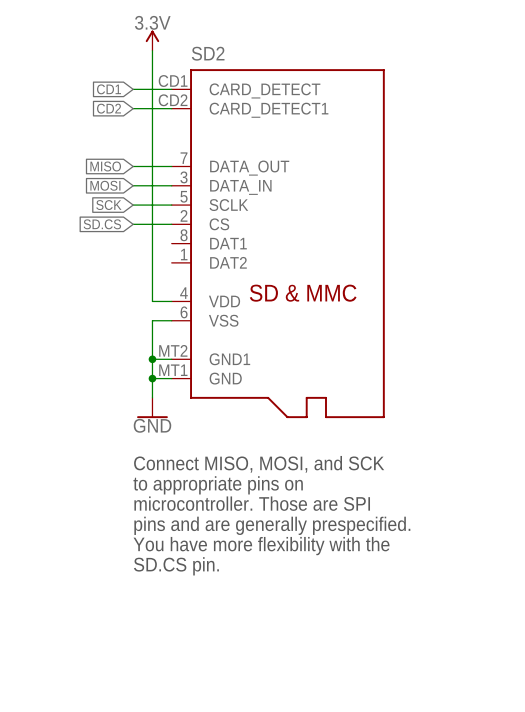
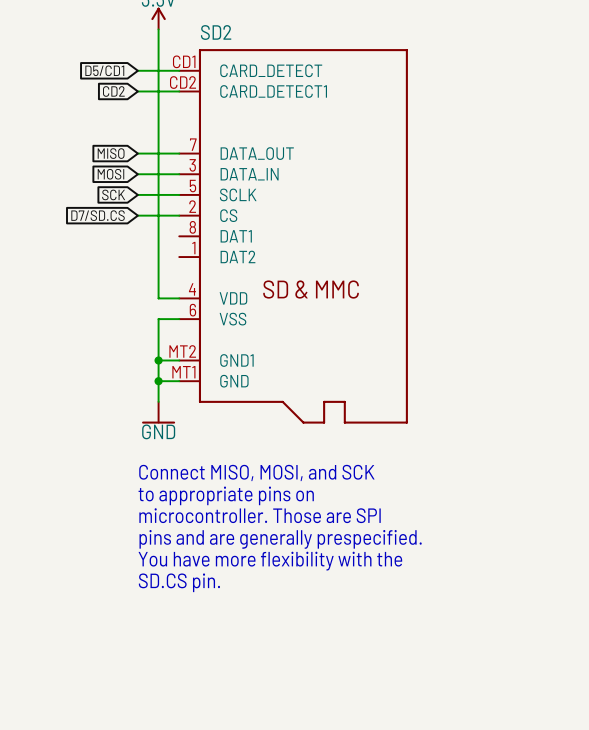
global label: CD1 (109, 89) -> D5/CD1 (104, 70)
global label: SD.CS (102, 224) -> D7/SD.CS (98, 215)

